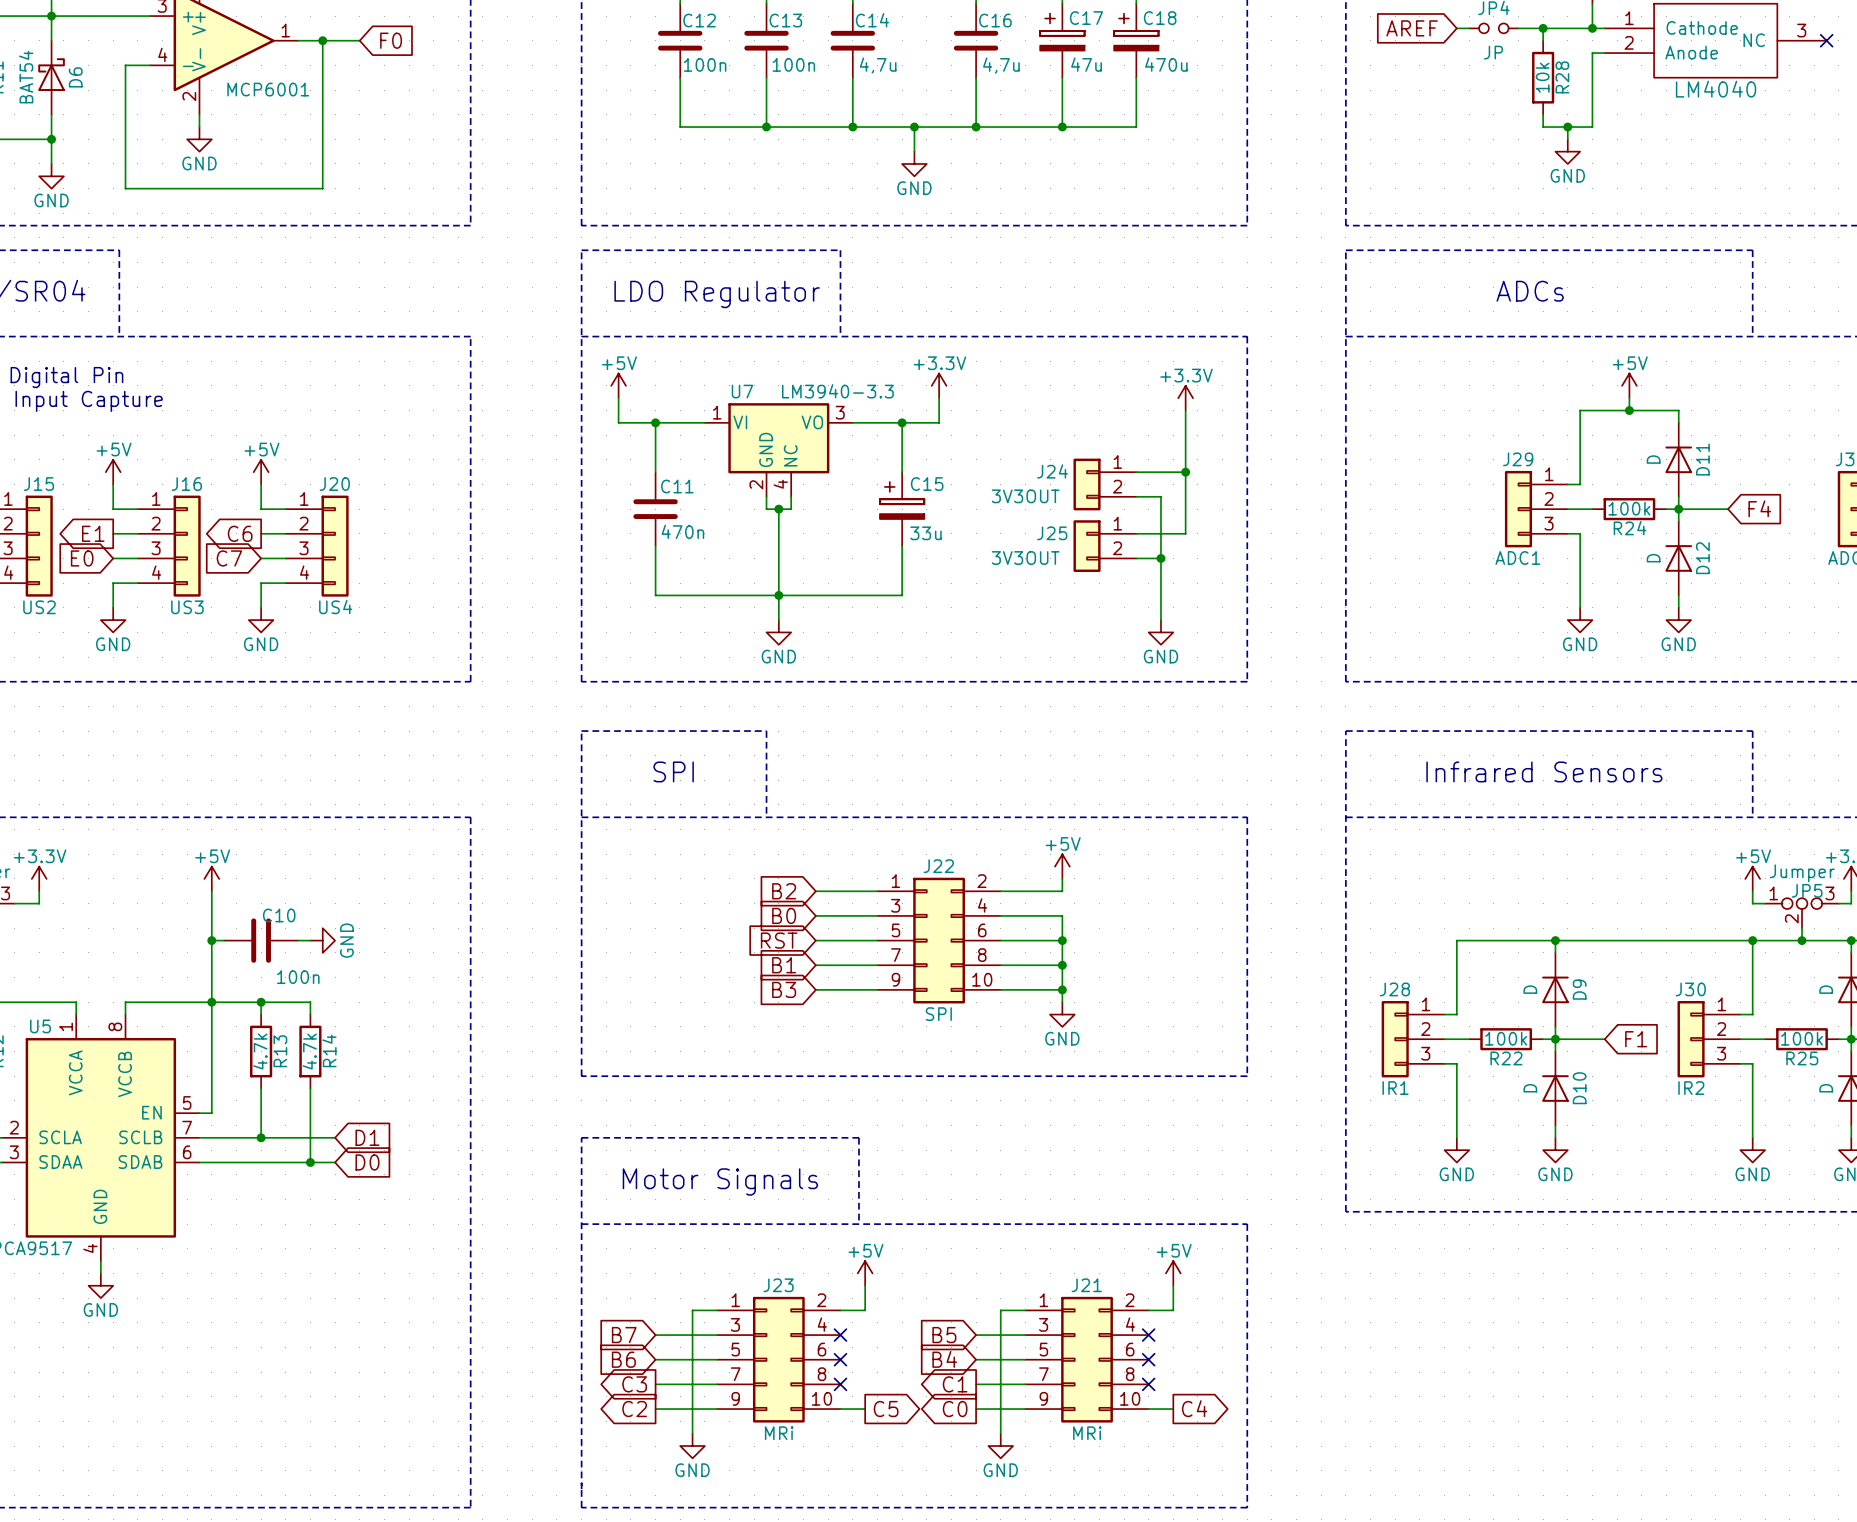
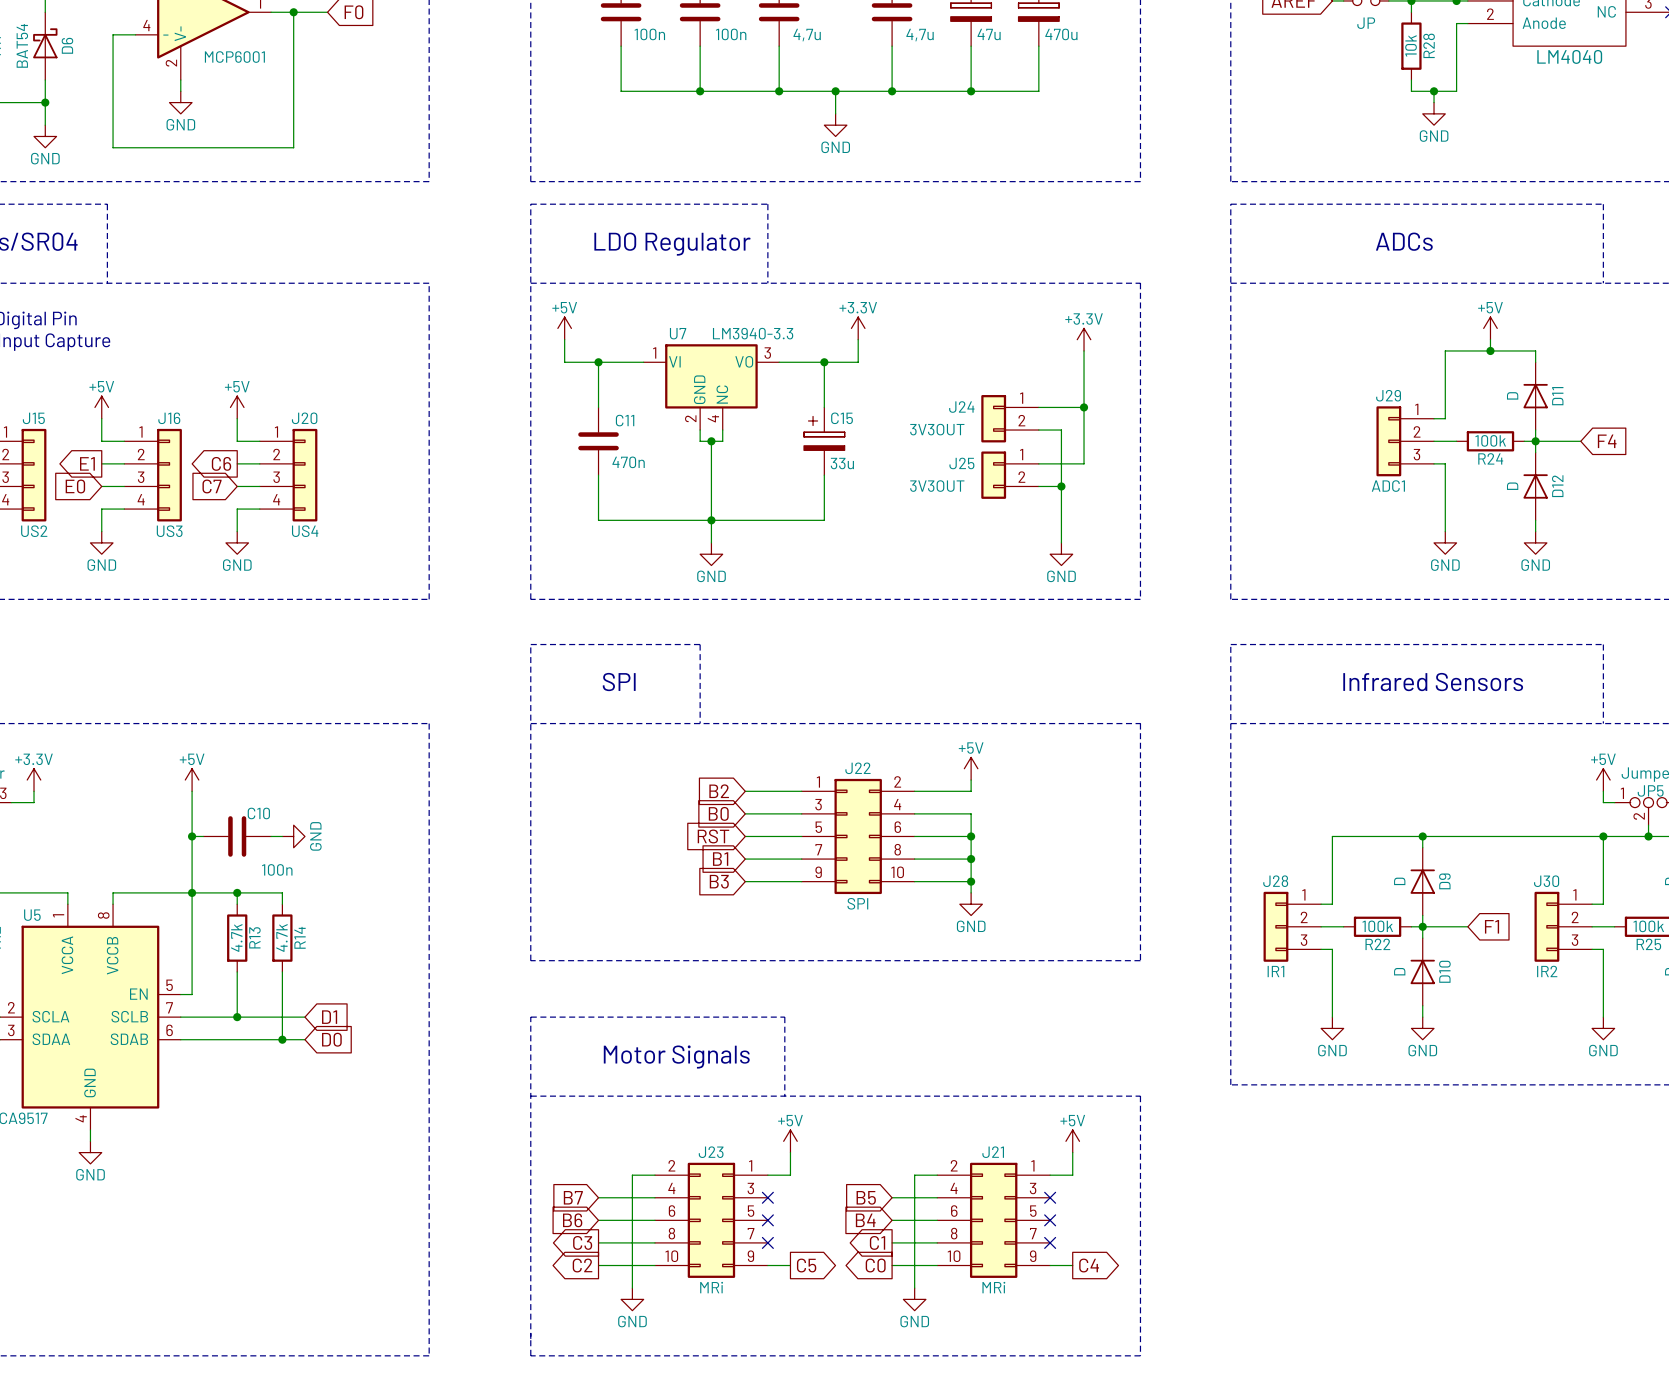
J23 flip: as is (778, 1359) -> left-right (711, 1220)
J21 flip: as is (1087, 1359) -> left-right (993, 1220)

